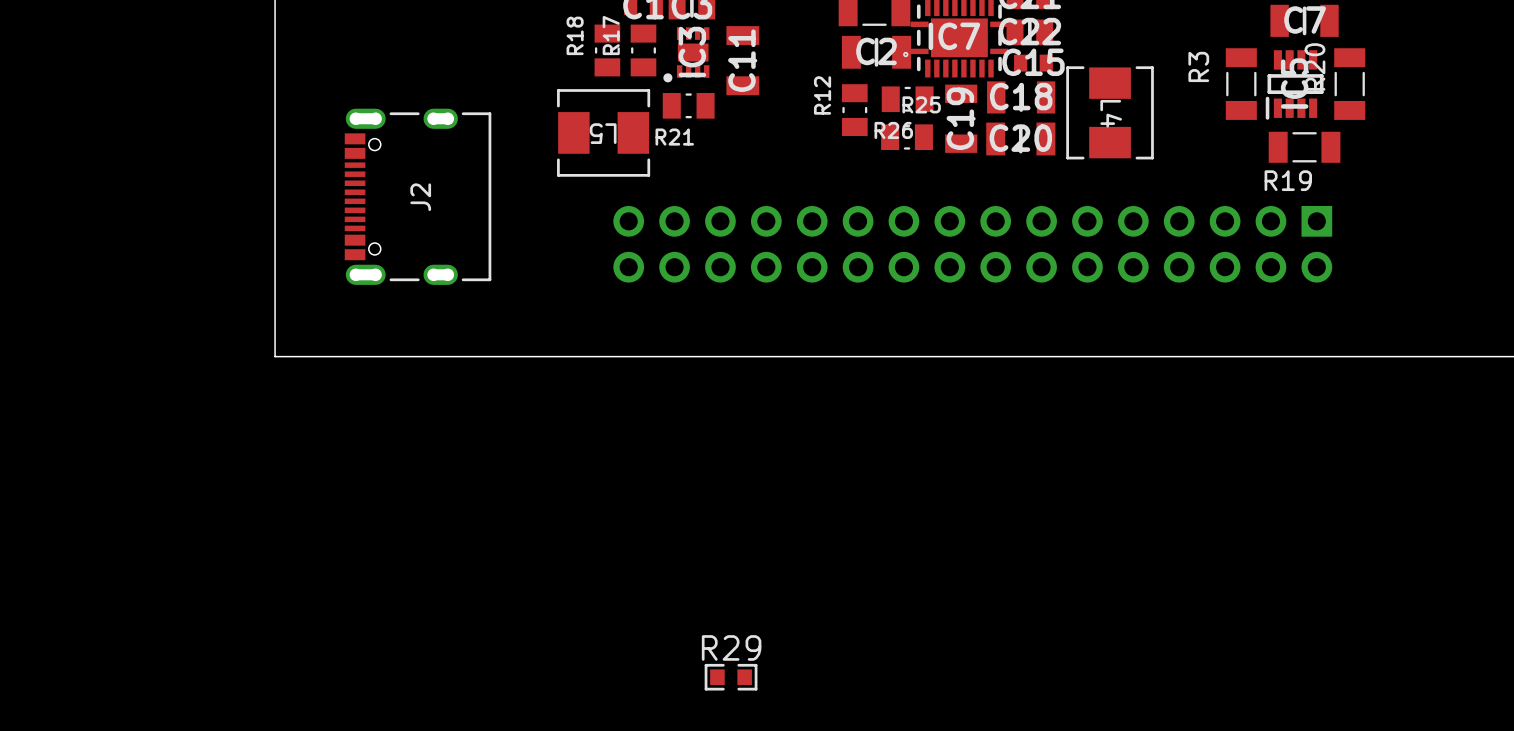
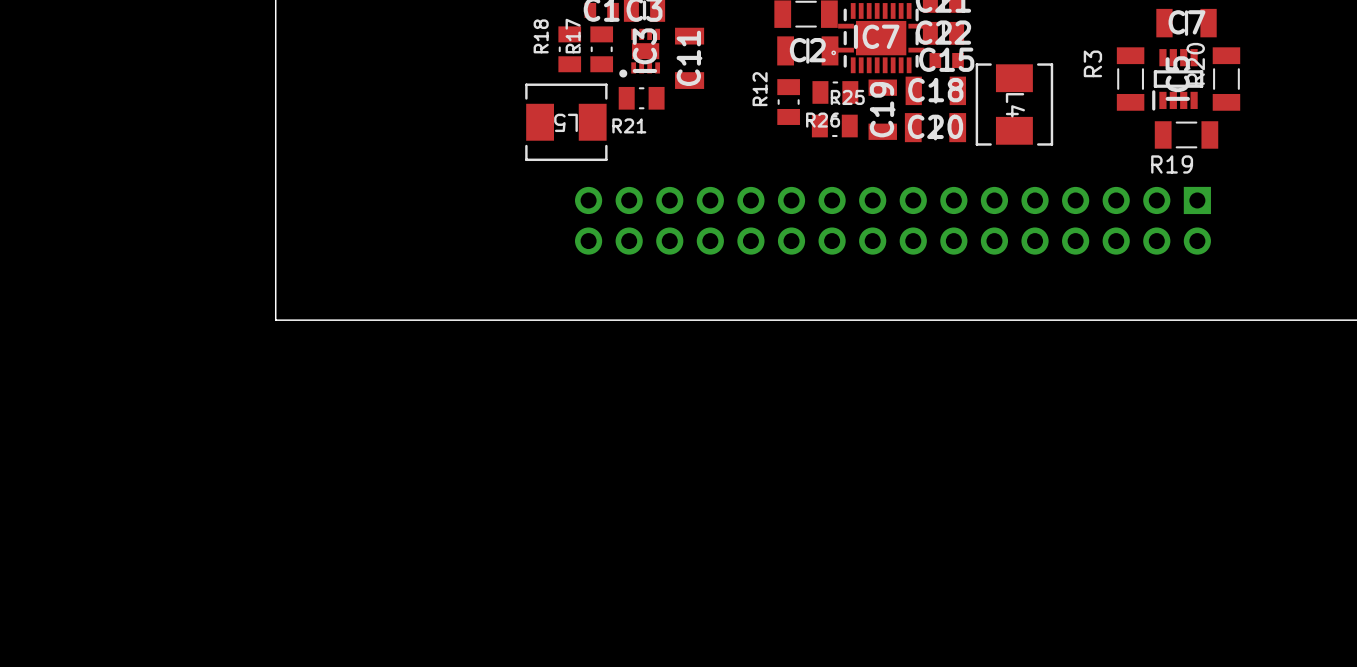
J2: (418, 196) -> none
R29: (731, 677) -> none

